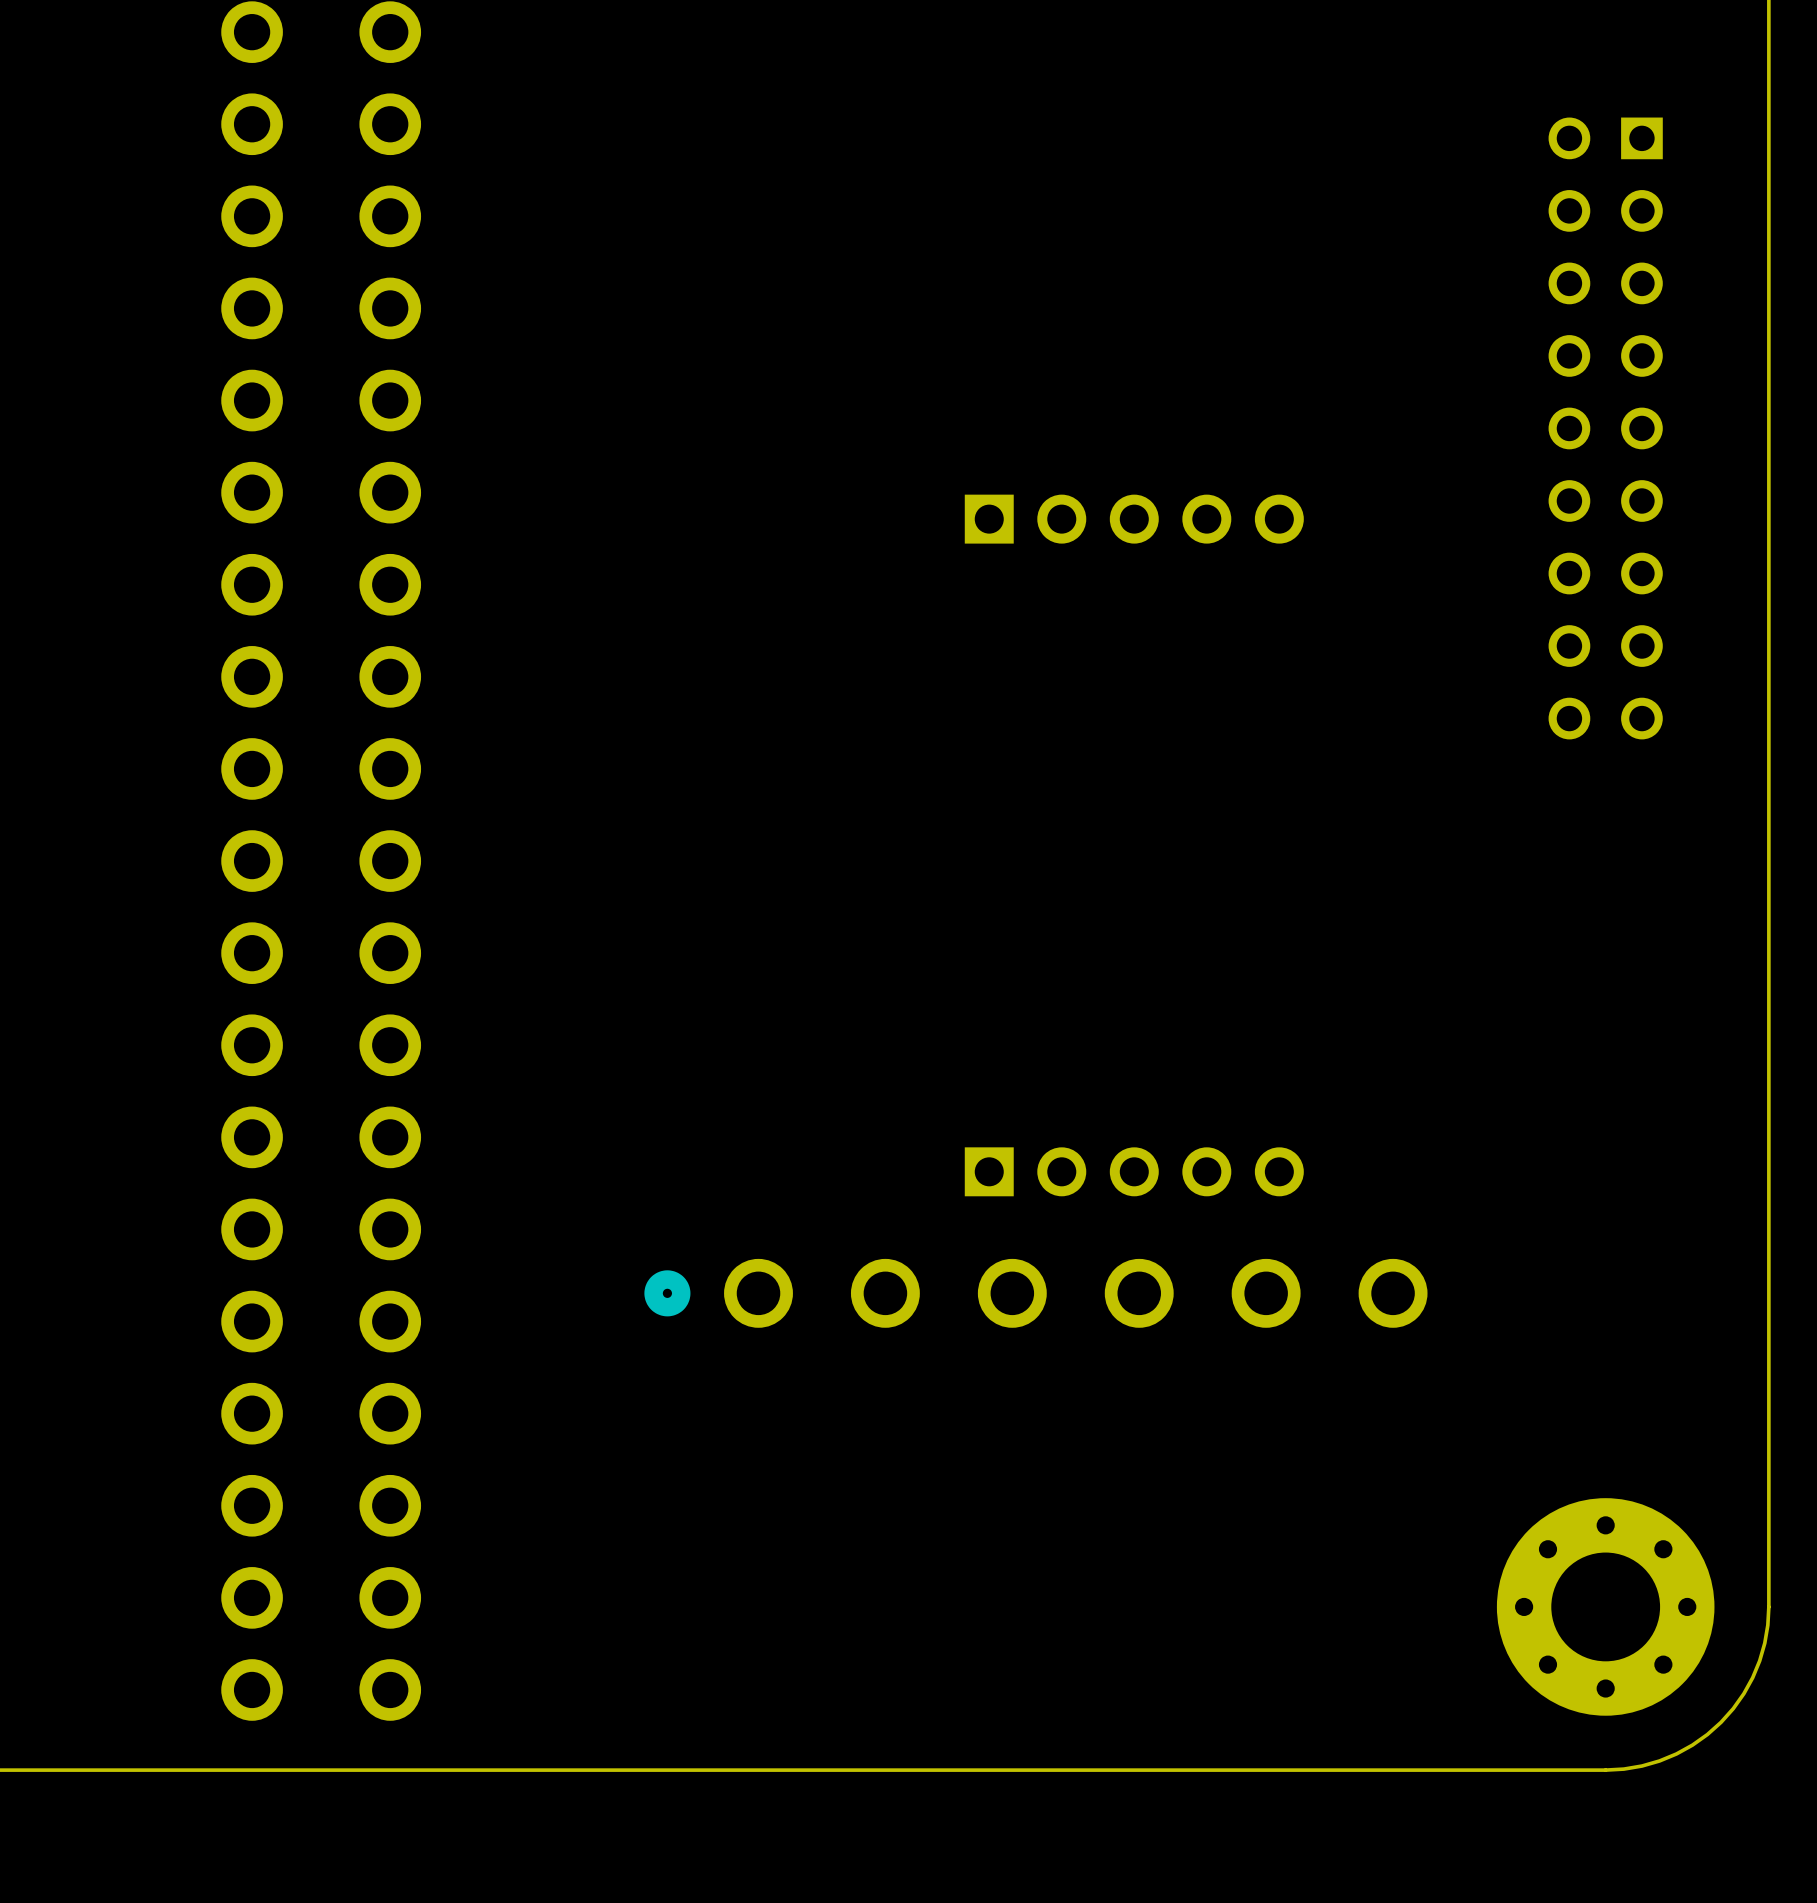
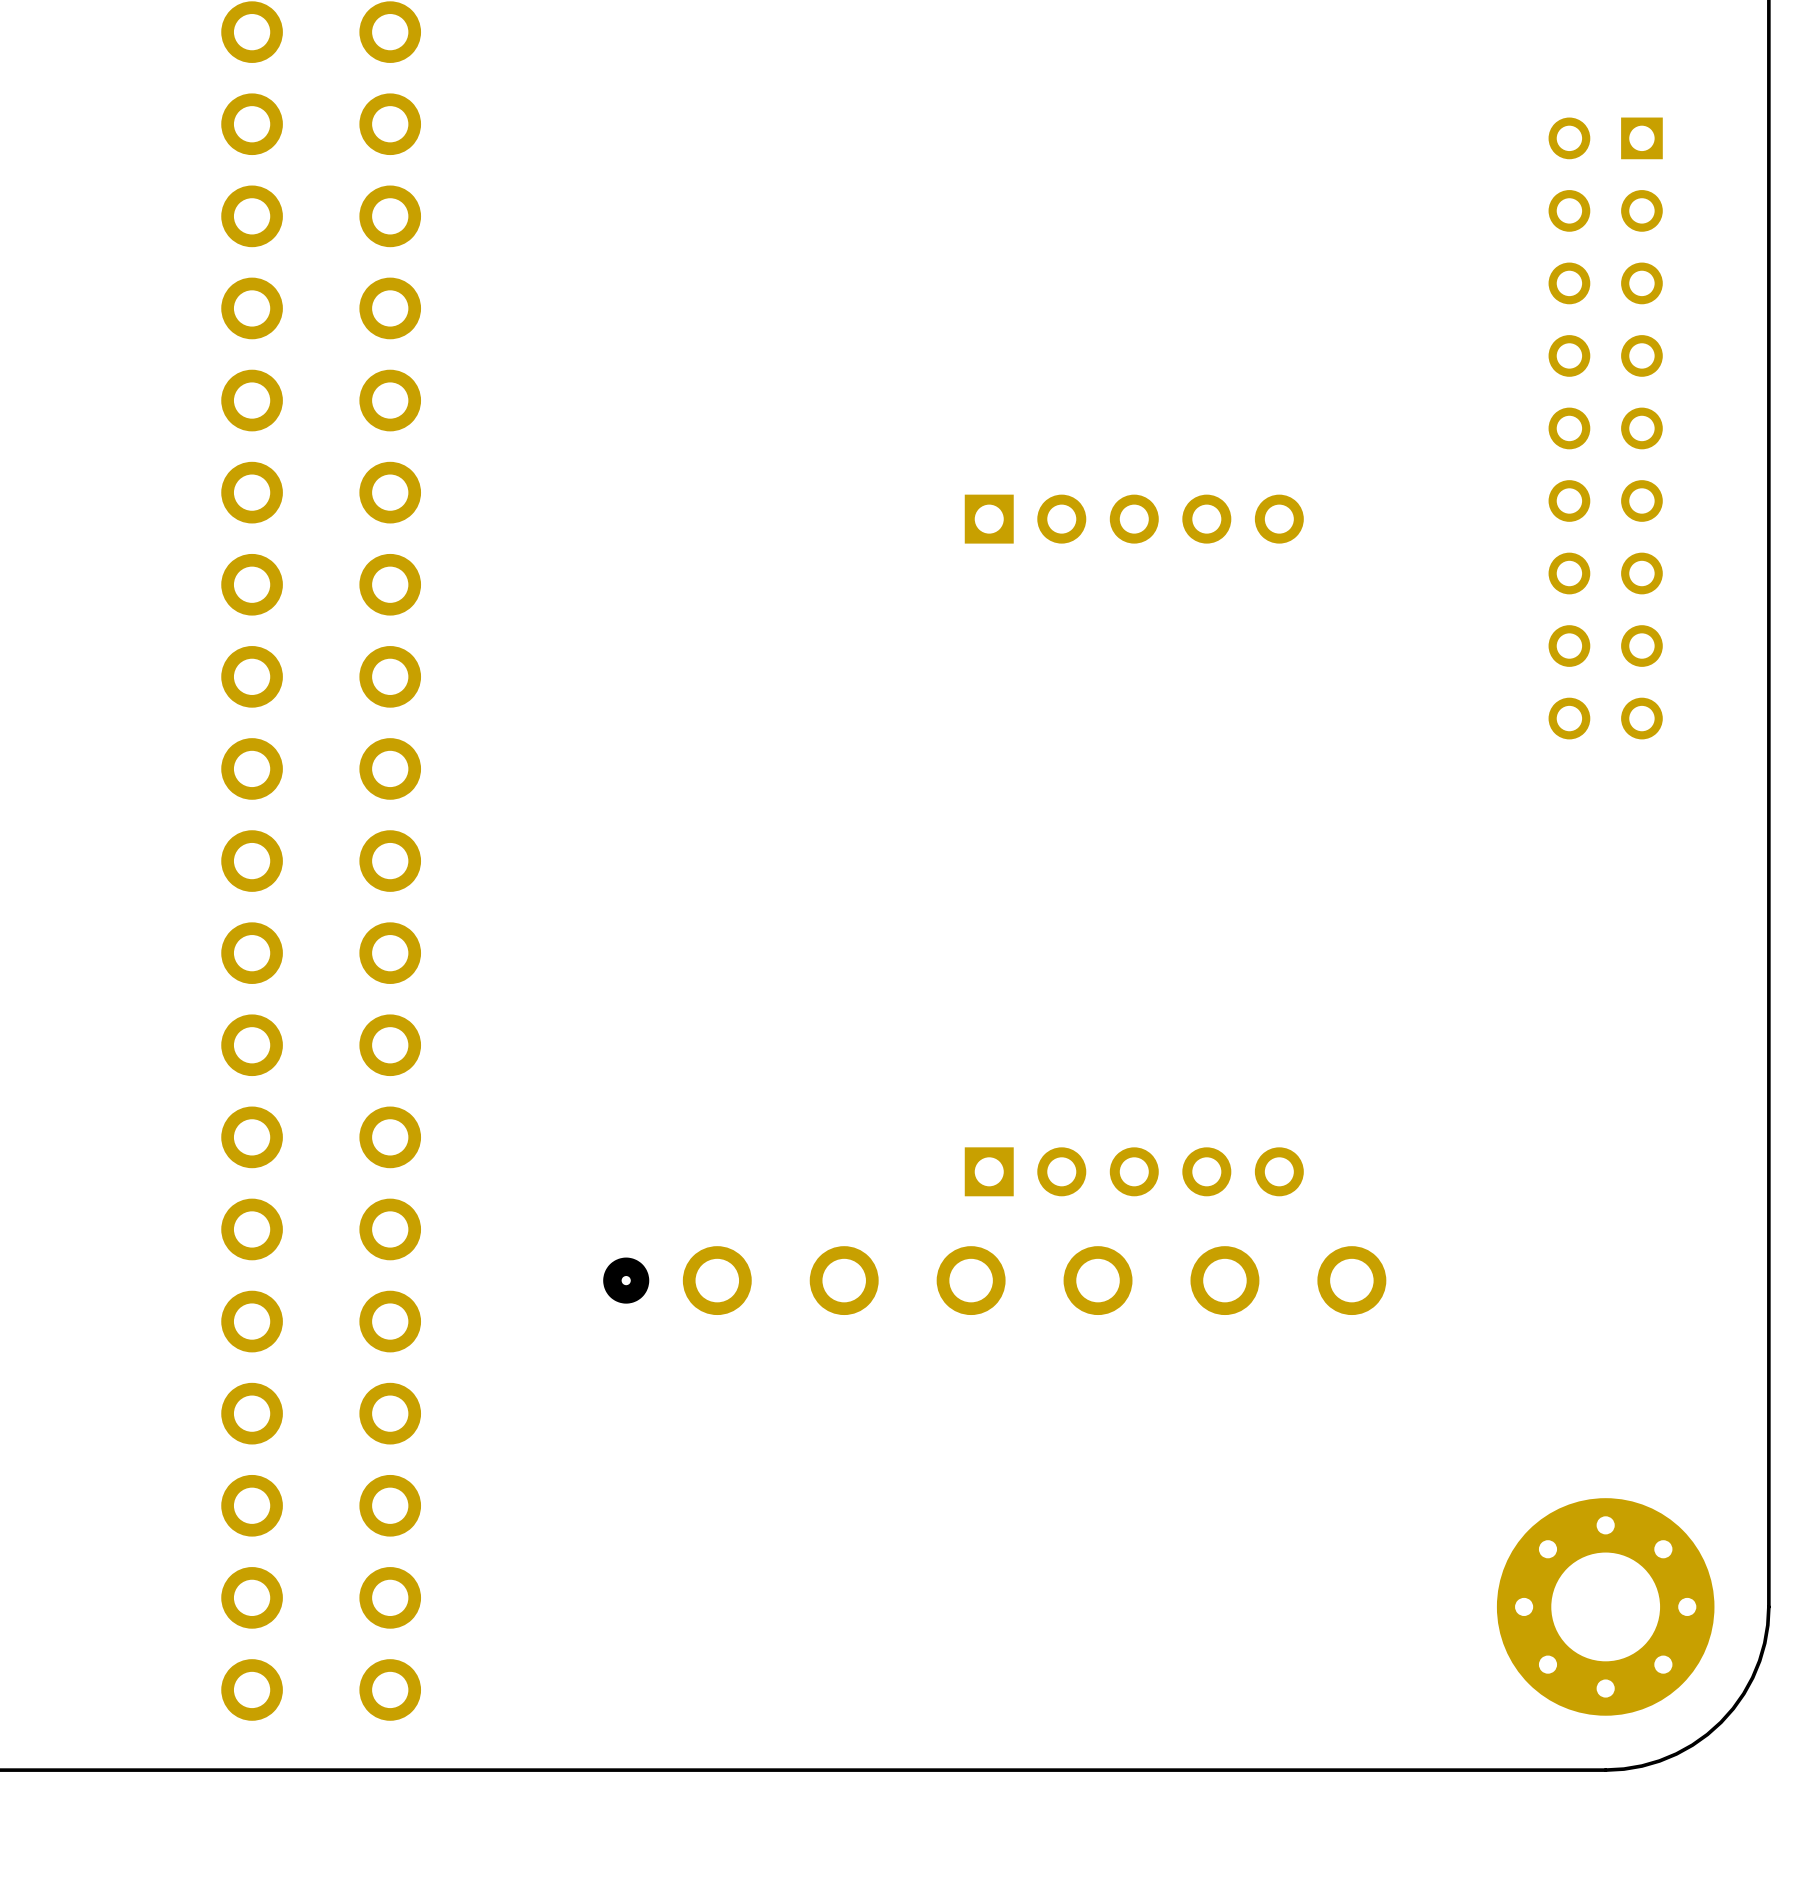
part position: (1035, 1293) -> (994, 1280)

